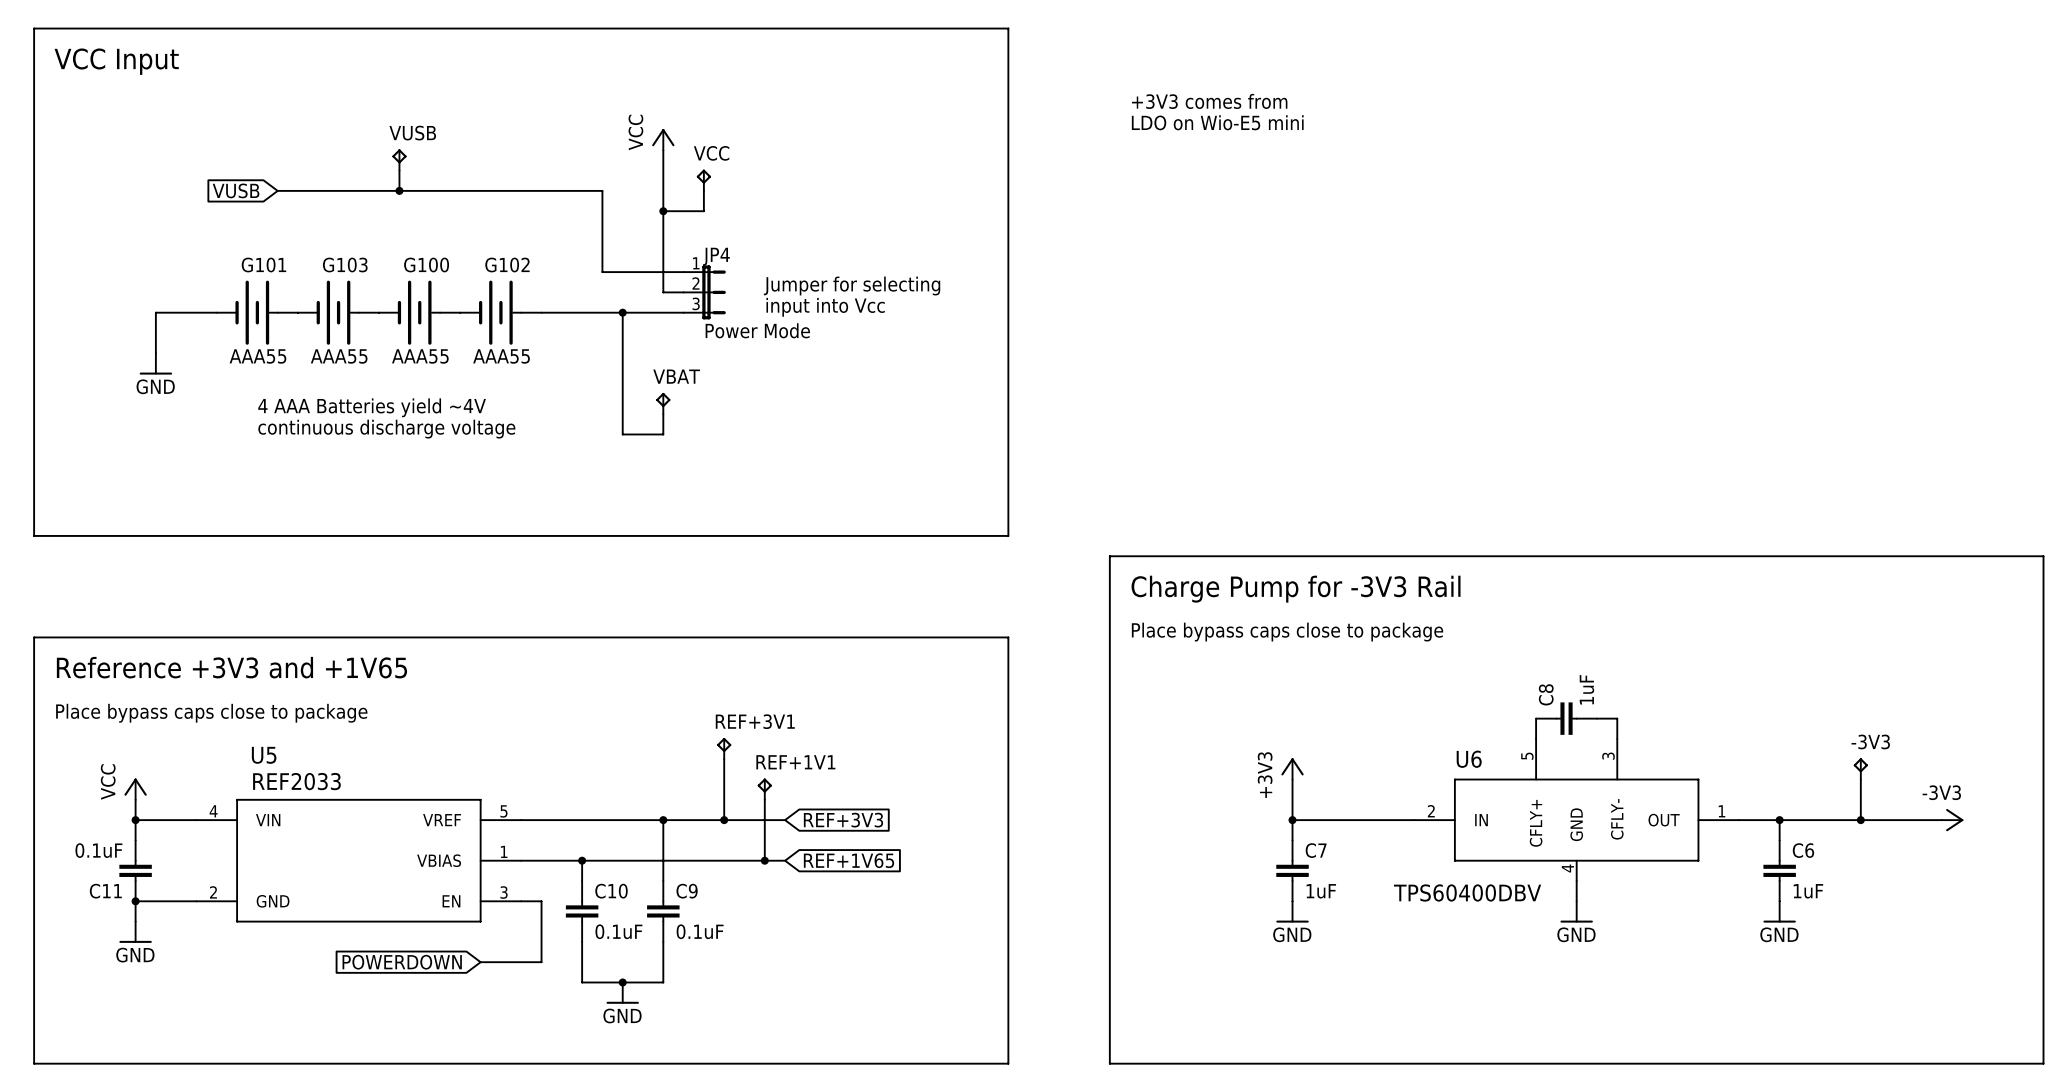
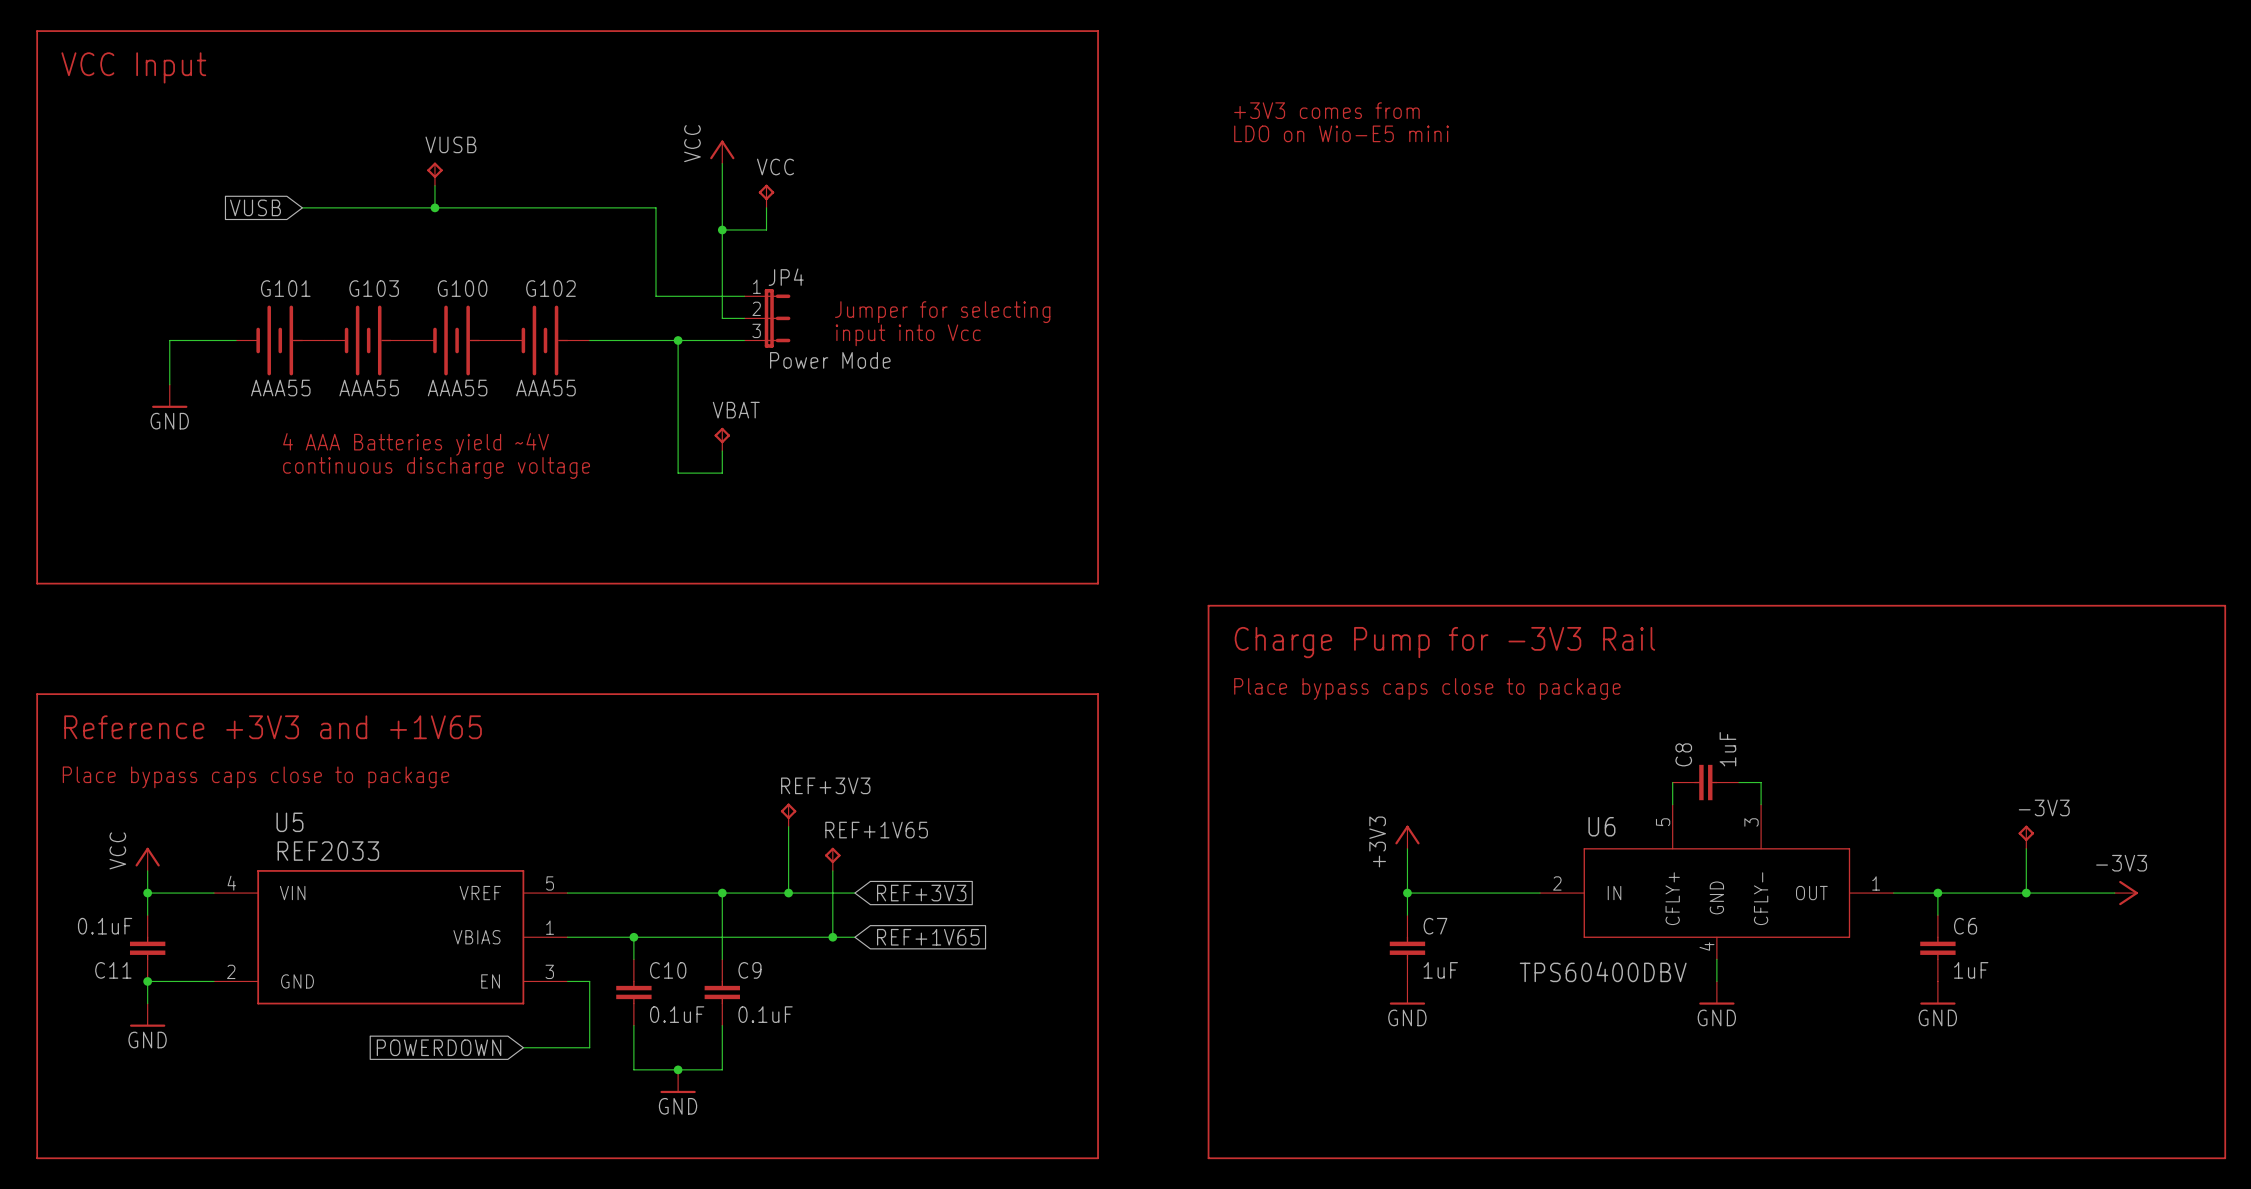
REF+3V1 name: REF+3V1 (755, 721) -> REF+3V3 (825, 785)
REF+1V1 name: REF+1V1 (795, 762) -> REF+1V65 (876, 830)

